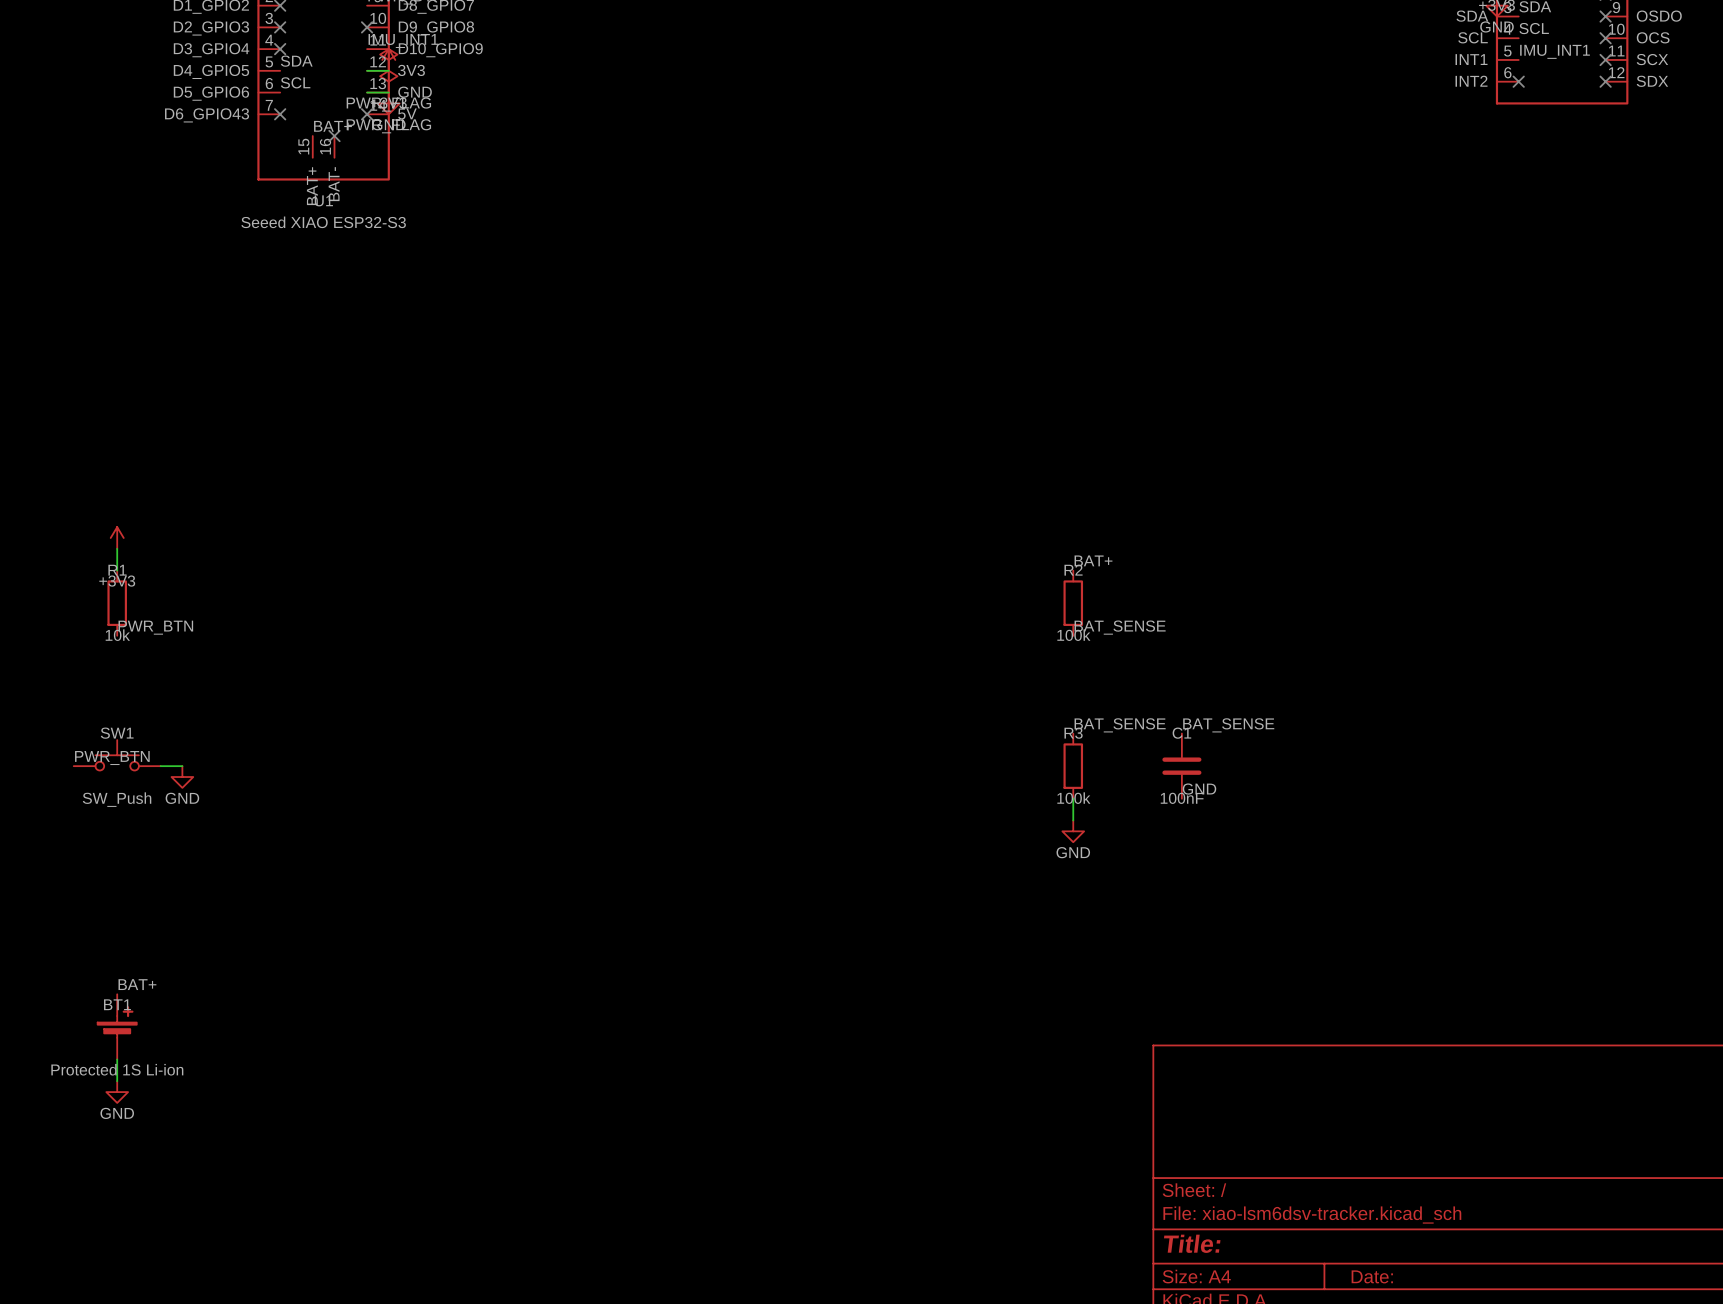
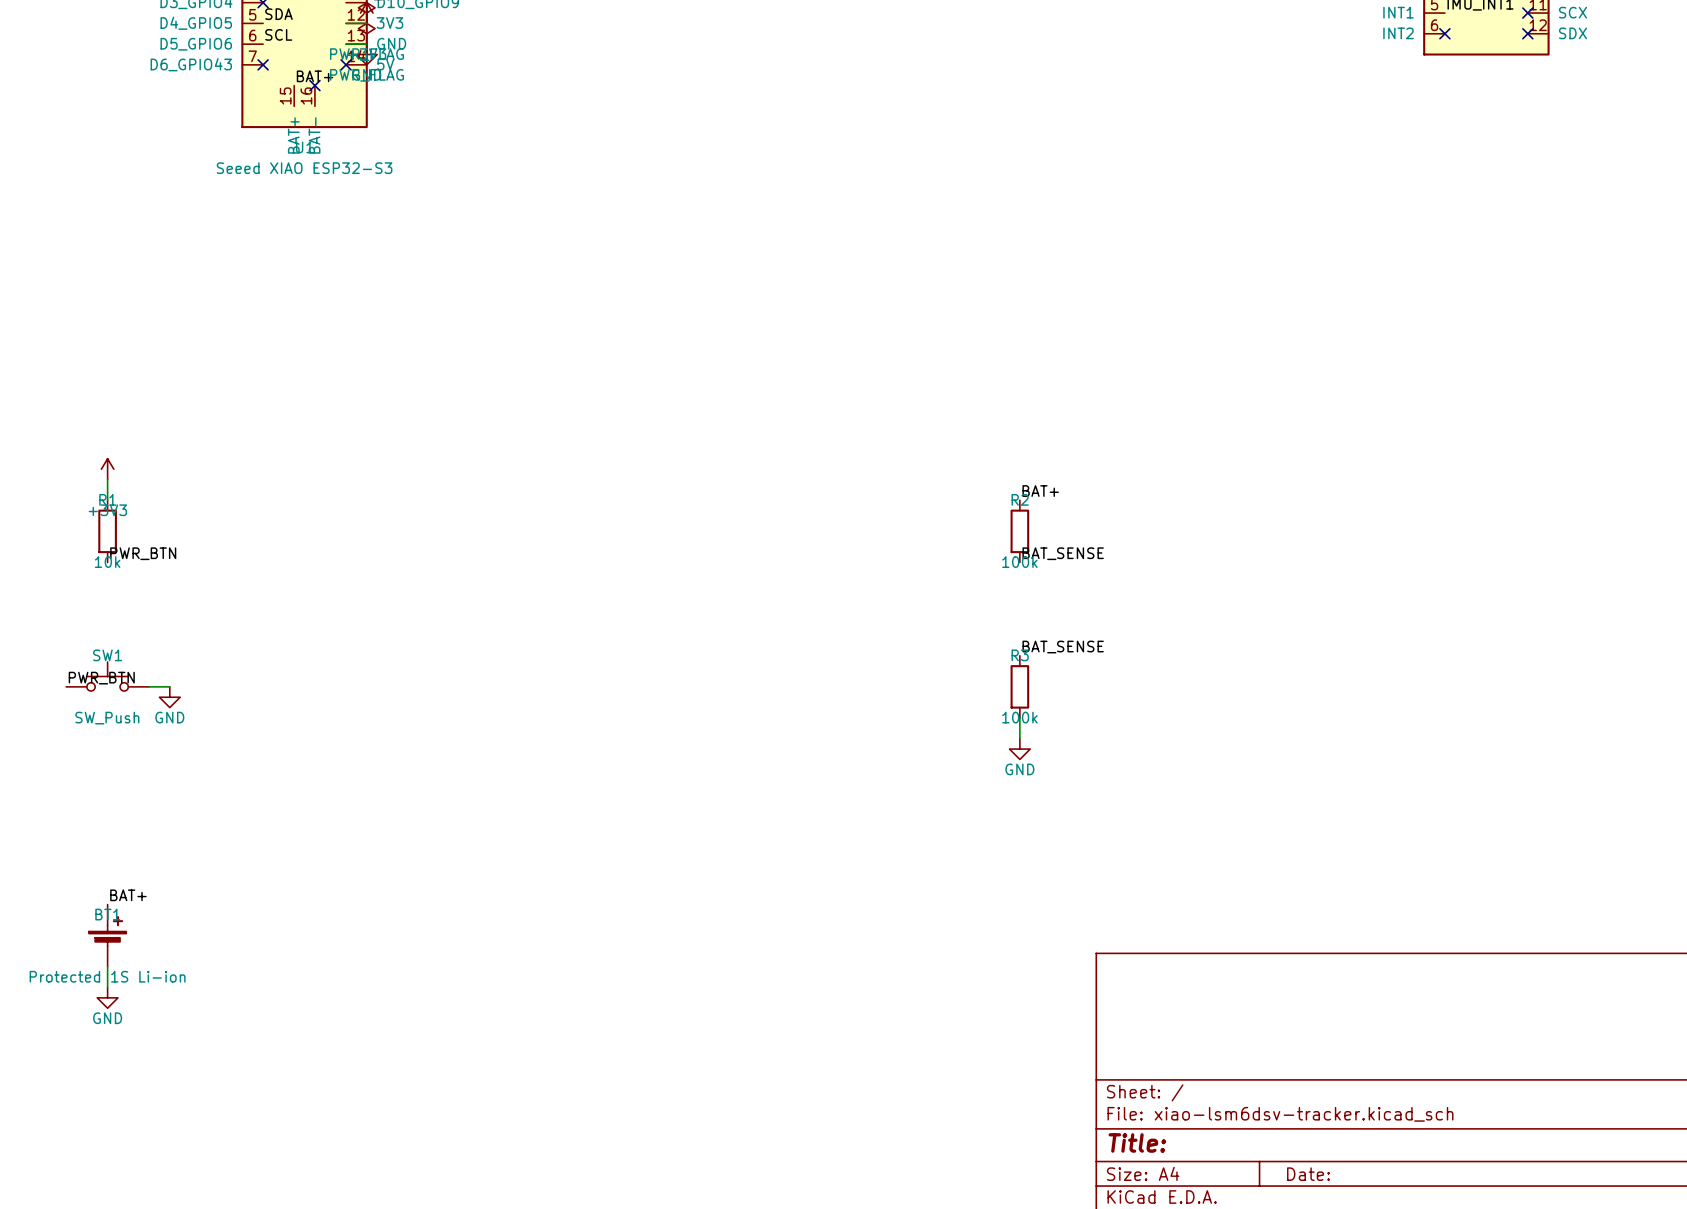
label: BAT_SENSE (1228, 725) -> none
C1: 100nF (1181, 766) -> none
label: GND (1199, 789) -> none

